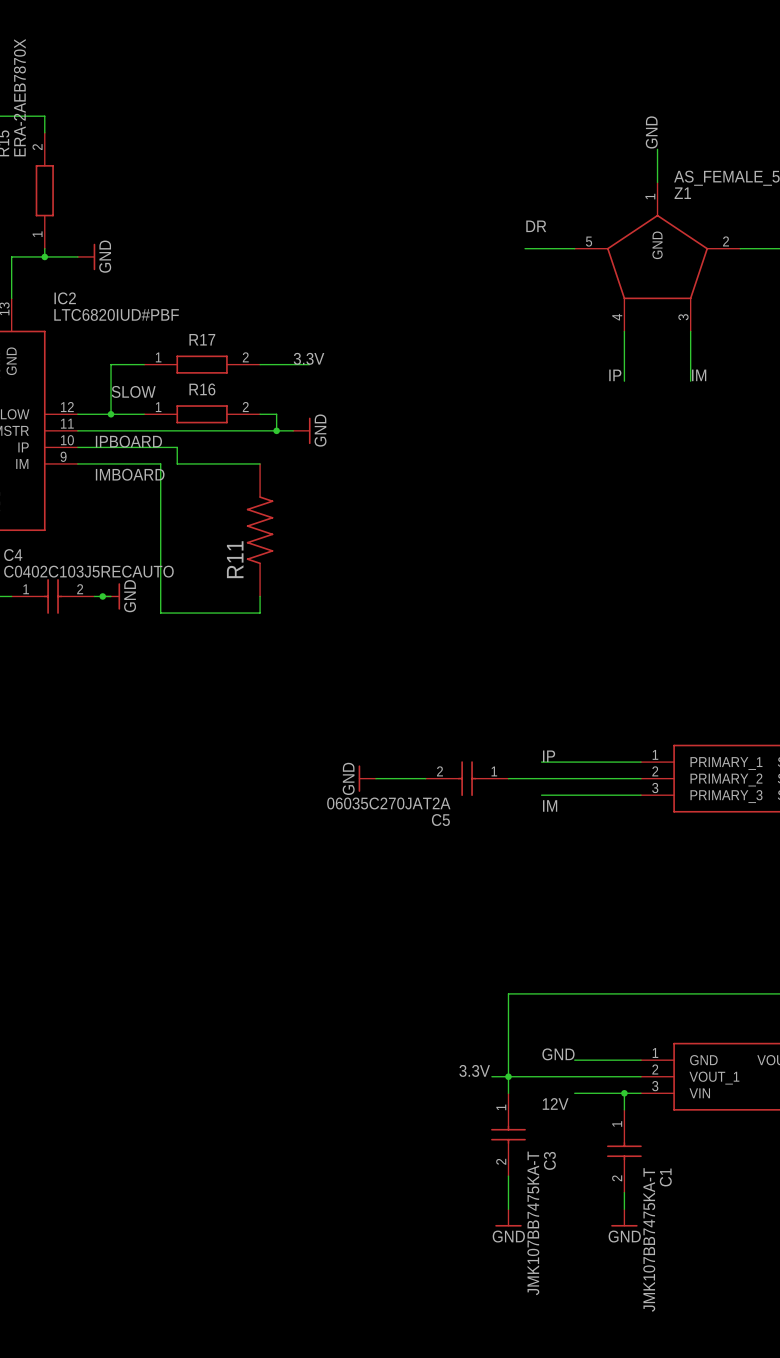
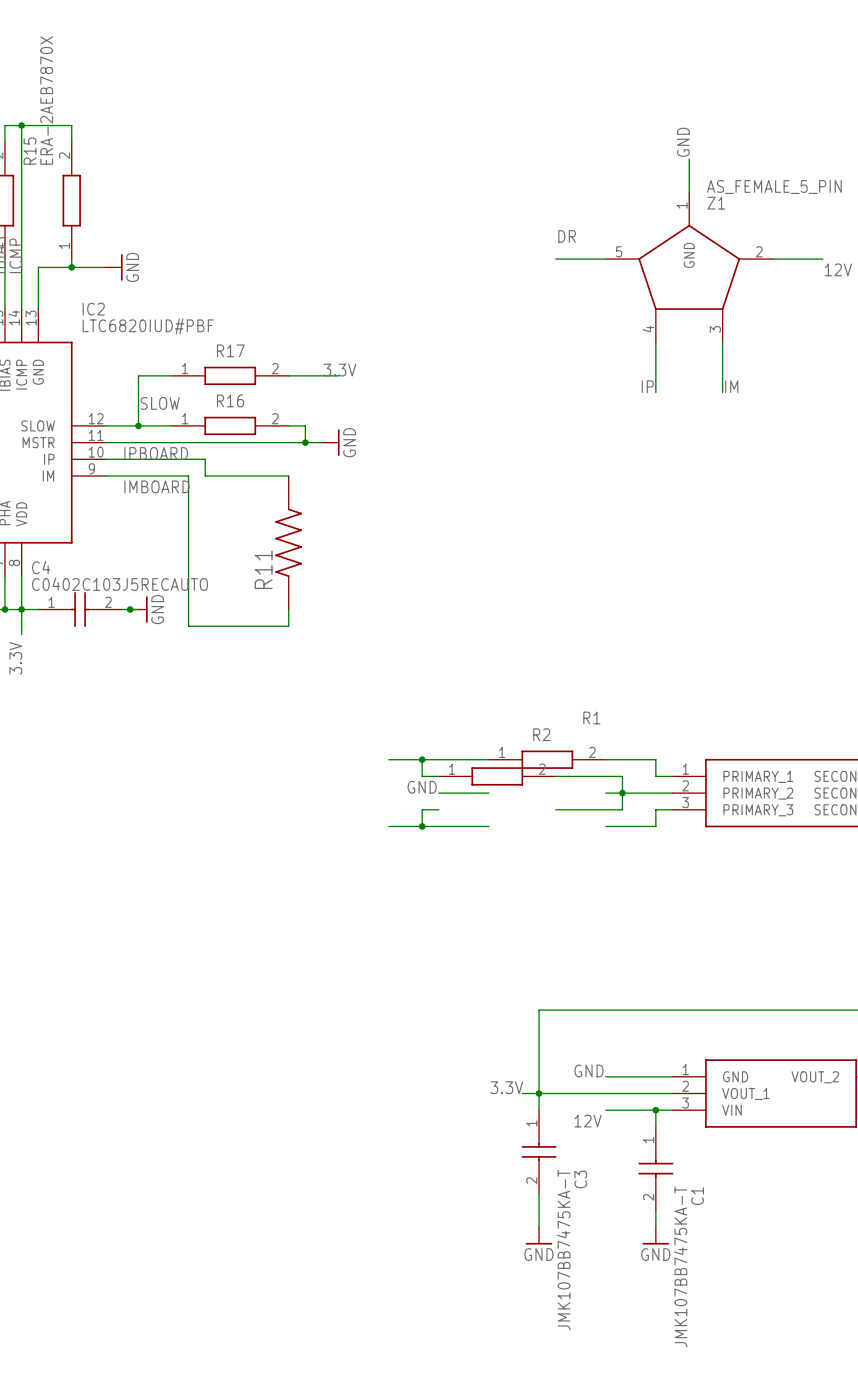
wire: none -> (388, 759) (488, 759)
wire: none -> (422, 759) (422, 776) (438, 776)
junction: none -> (422, 759)
R1: none -> (547, 759)
label: IP (549, 756) -> none
R2: none -> (497, 776)
wire: none -> (555, 776) (572, 776)
wire: (591, 762) (624, 762) -> (605, 759) (655, 759) (655, 776)
wire: none -> (622, 776) (622, 809)
label: none -> GND (422, 787)
power symbol: GND (367, 778) -> none
C5: 06035C270JAT2A (467, 778) -> none
wire: (508, 778) (574, 778) -> none
junction: none -> (622, 793)
wire: none -> (438, 809) (422, 809) (422, 826)
wire: none -> (555, 809) (572, 809)
wire: (591, 795) (624, 795) -> (605, 826) (655, 826) (655, 809)
label: IM (550, 805) -> none
wire: none -> (388, 826) (488, 826)
junction: none -> (422, 826)

